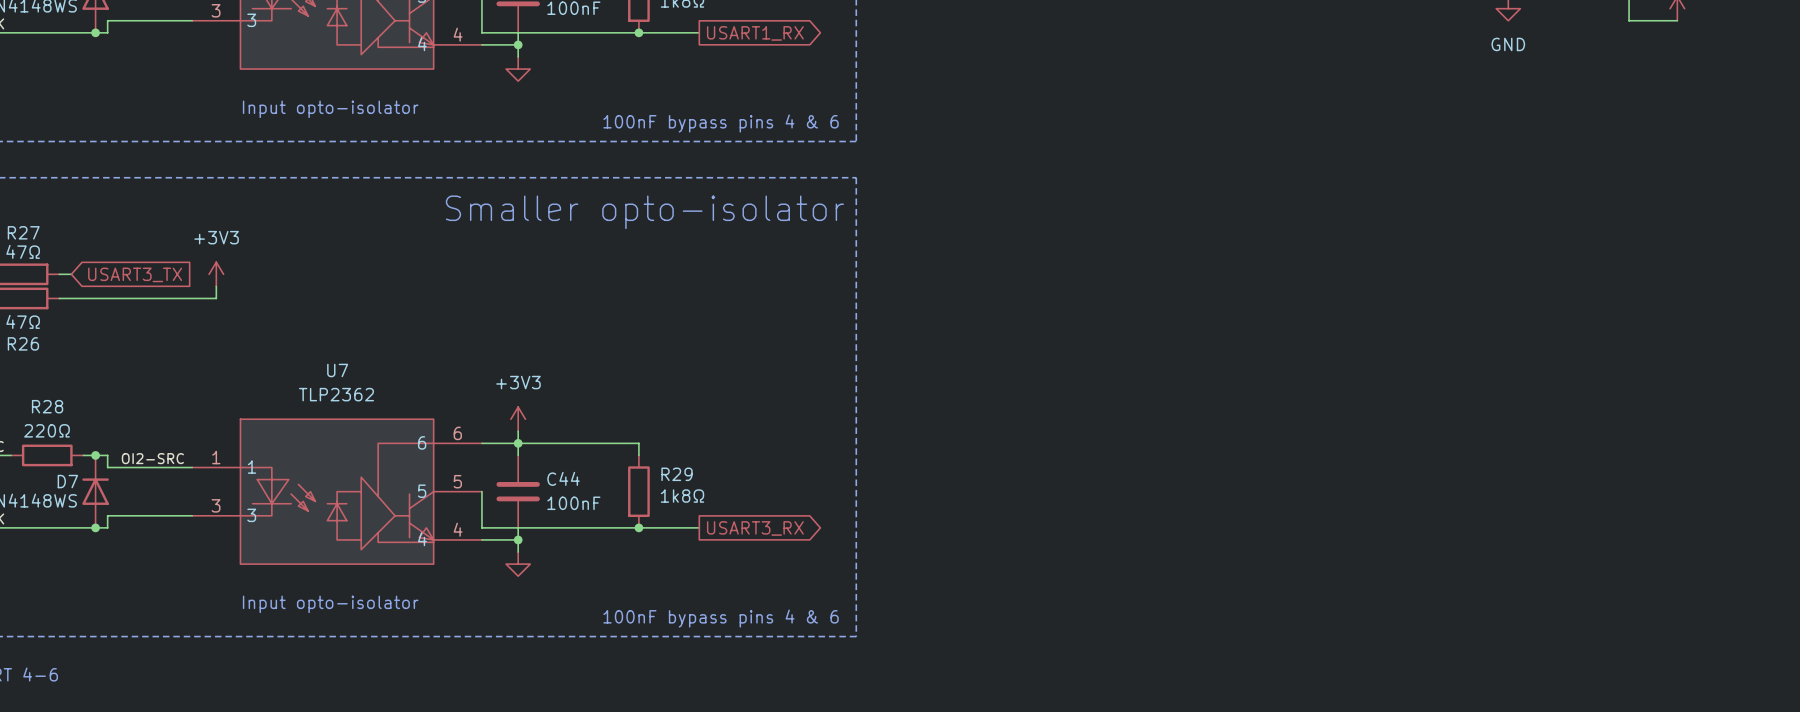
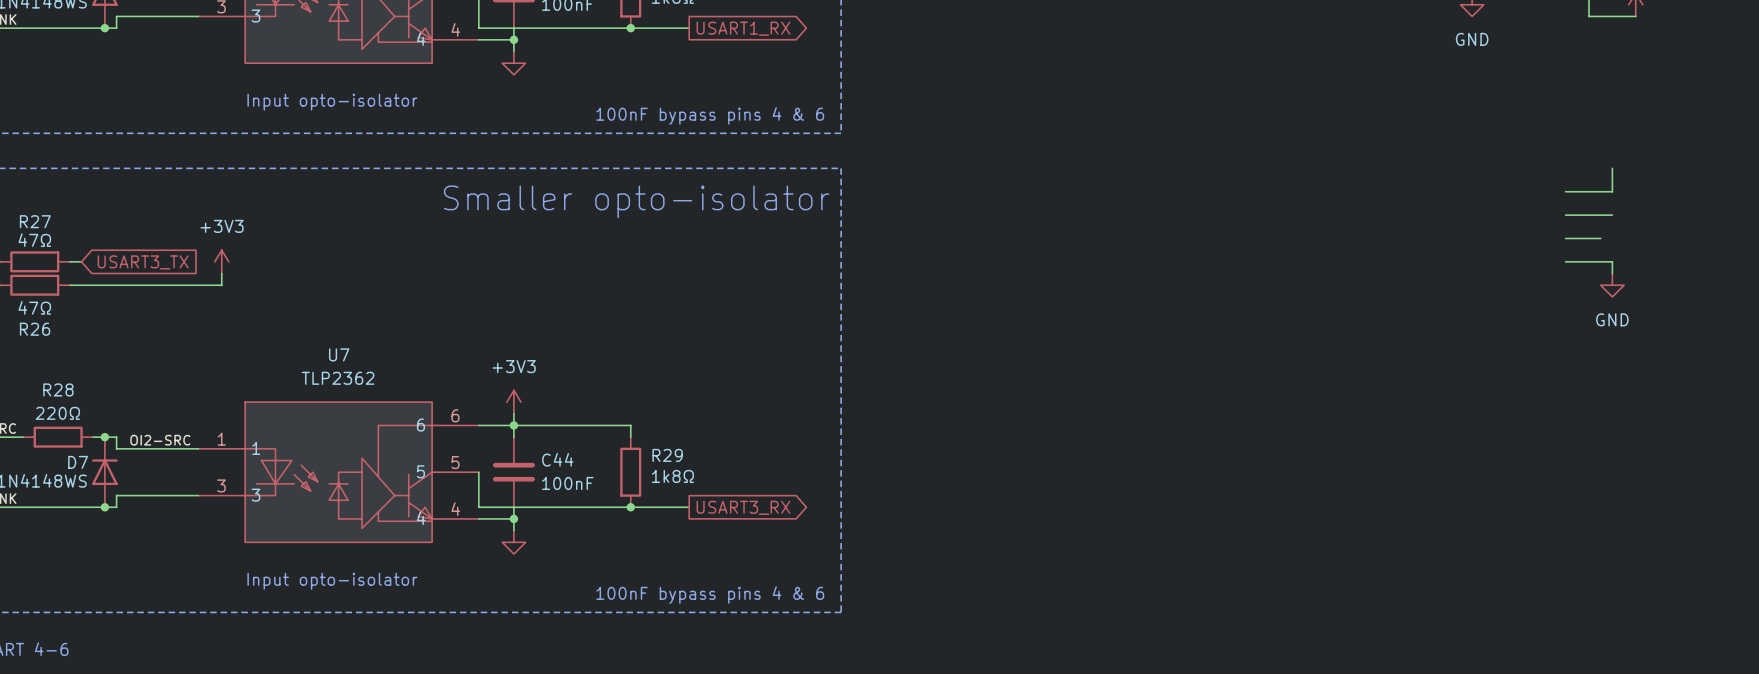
wire: none -> (1612, 168) (1612, 191) (1565, 191)
wire: none -> (1565, 215) (1612, 215)
wire: none -> (1565, 238) (1600, 238)
wire: none -> (1565, 261) (1612, 261) (1612, 273)
power symbol: none -> GND (1612, 285)

